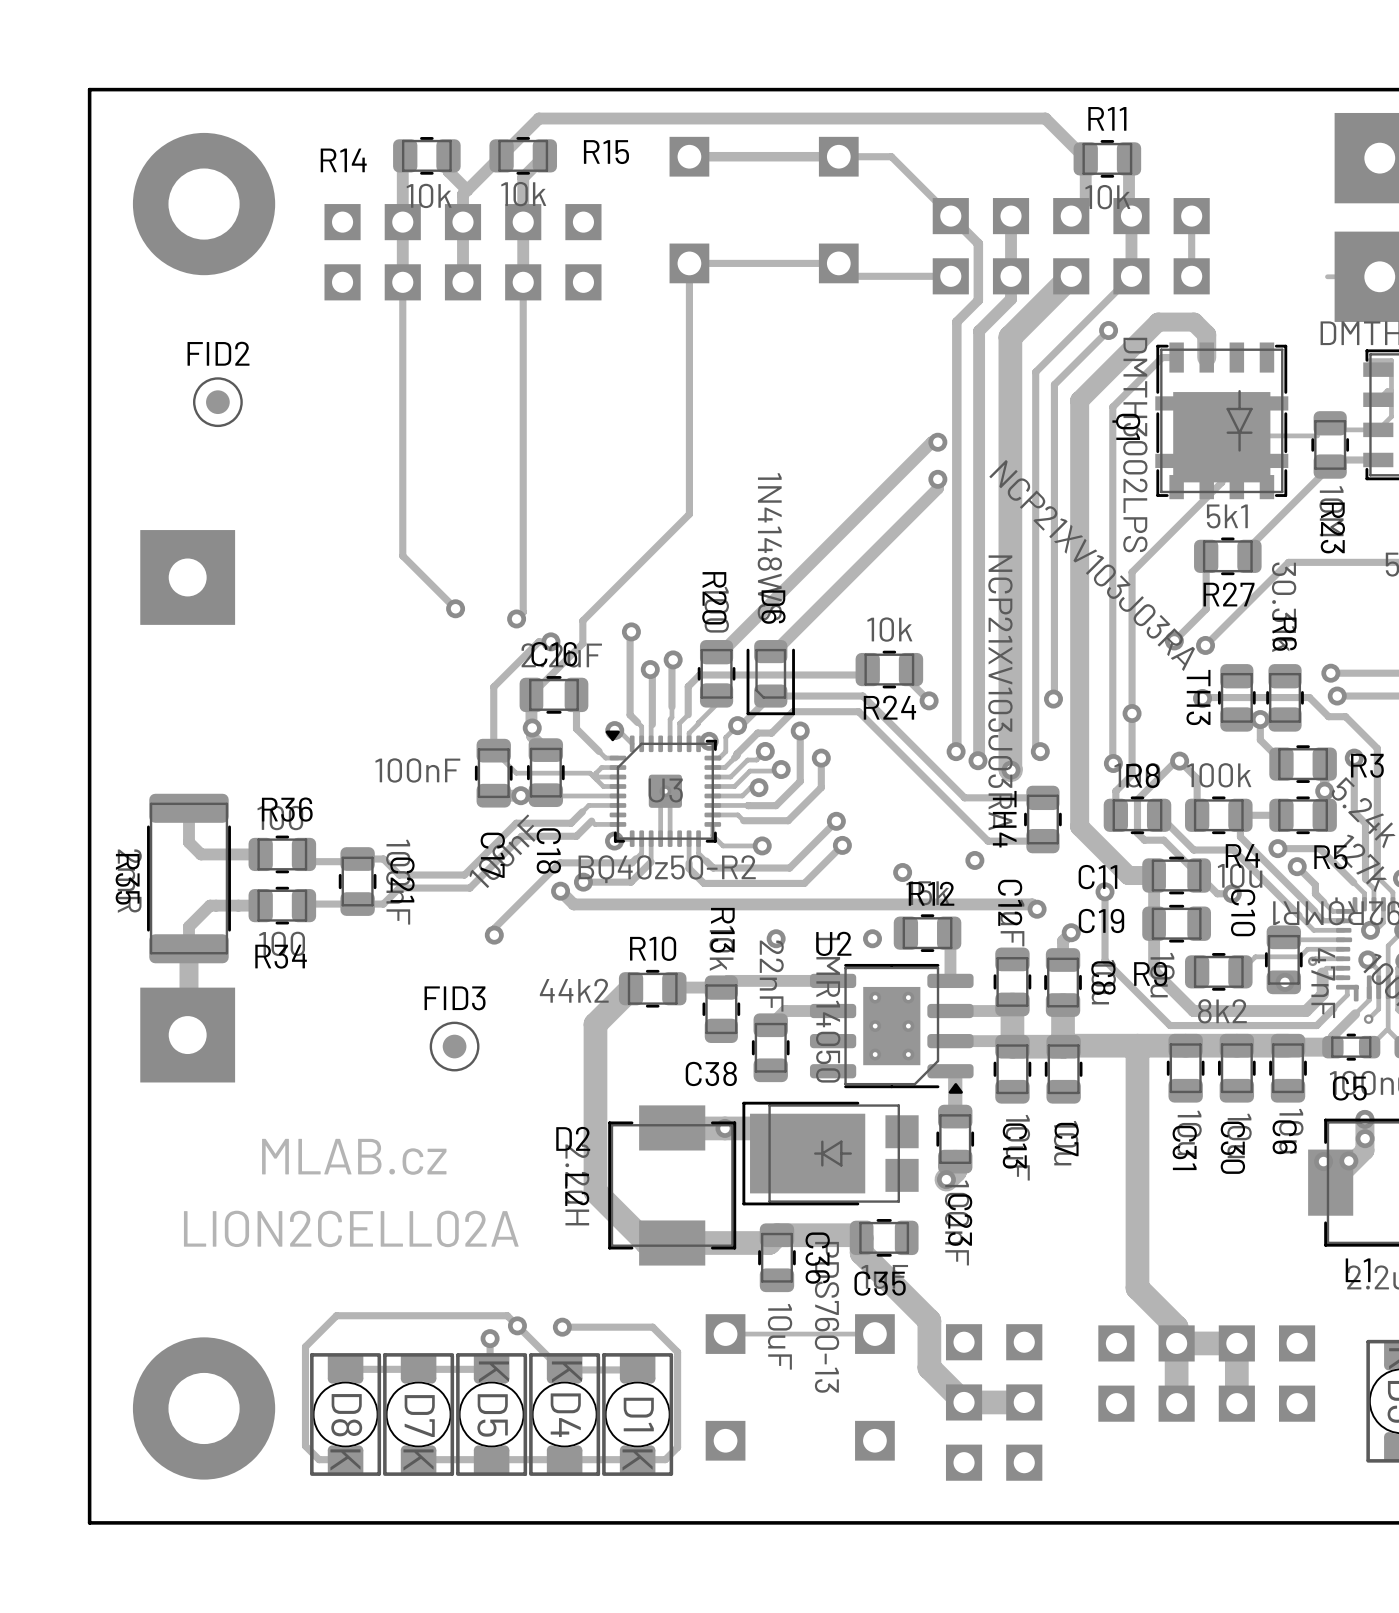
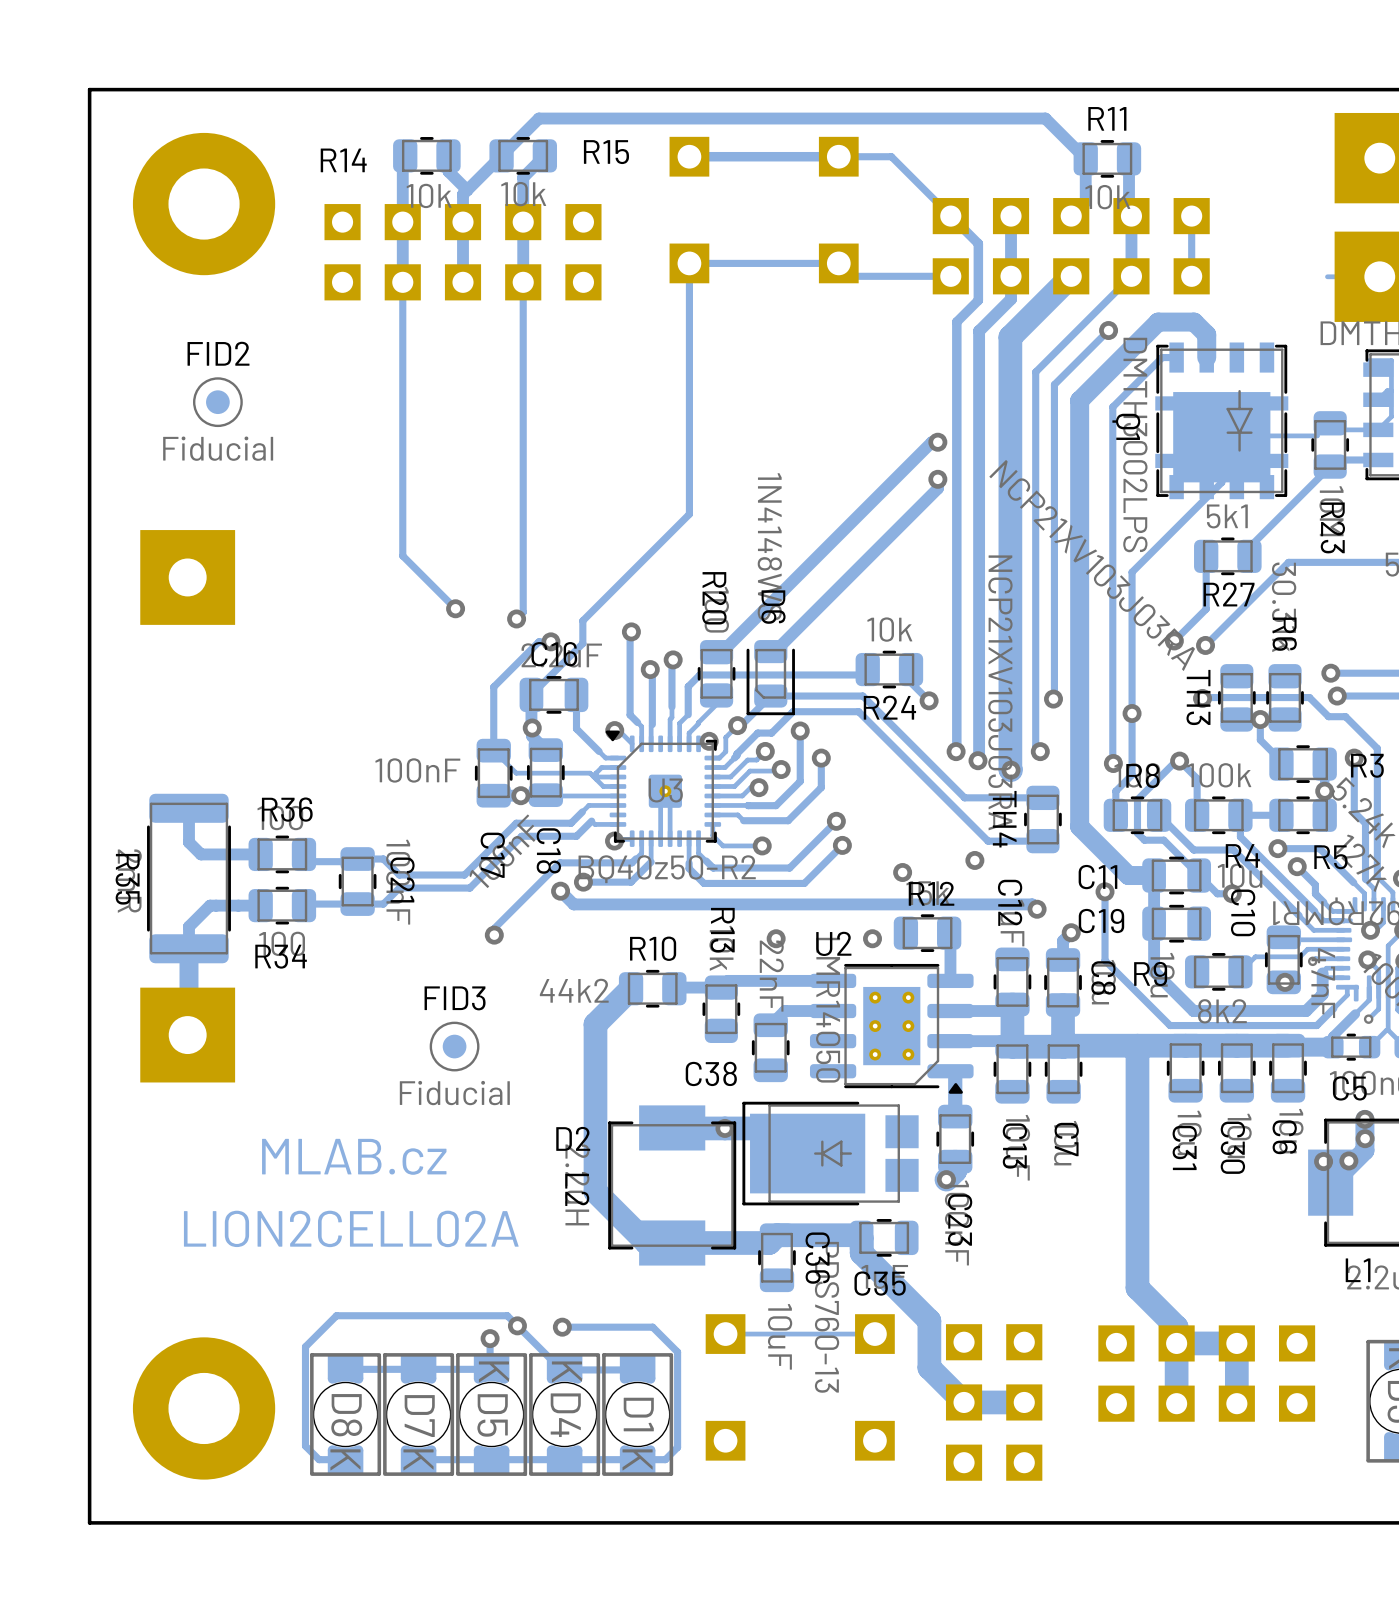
FID2 value: none -> Fiducial (218, 448)
FID3 value: none -> Fiducial (454, 1093)

